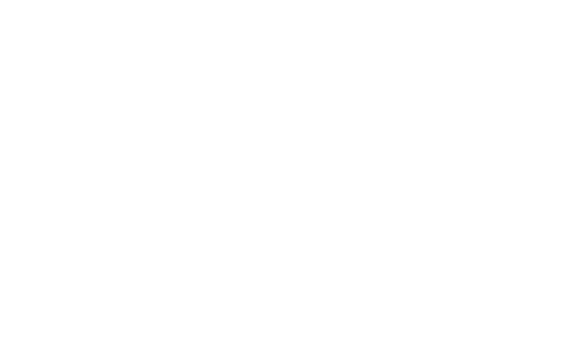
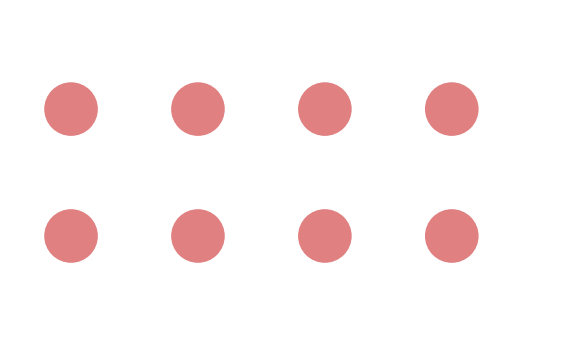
part: none -> (71, 109)
part: none -> (197, 109)
part: none -> (324, 109)
part: none -> (451, 109)
part: none -> (71, 235)
part: none -> (197, 235)
part: none -> (324, 235)
part: none -> (451, 235)

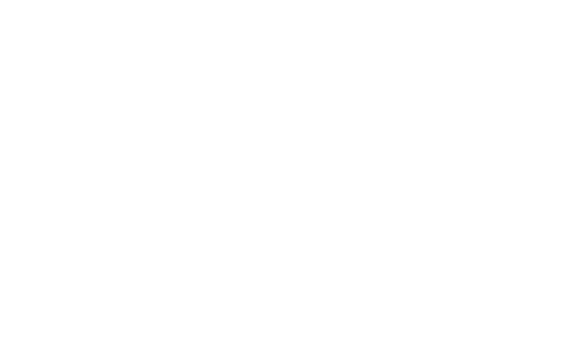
part: (71, 109) -> none
part: (197, 109) -> none
part: (324, 109) -> none
part: (451, 109) -> none
part: (71, 235) -> none
part: (197, 235) -> none
part: (324, 235) -> none
part: (451, 235) -> none

